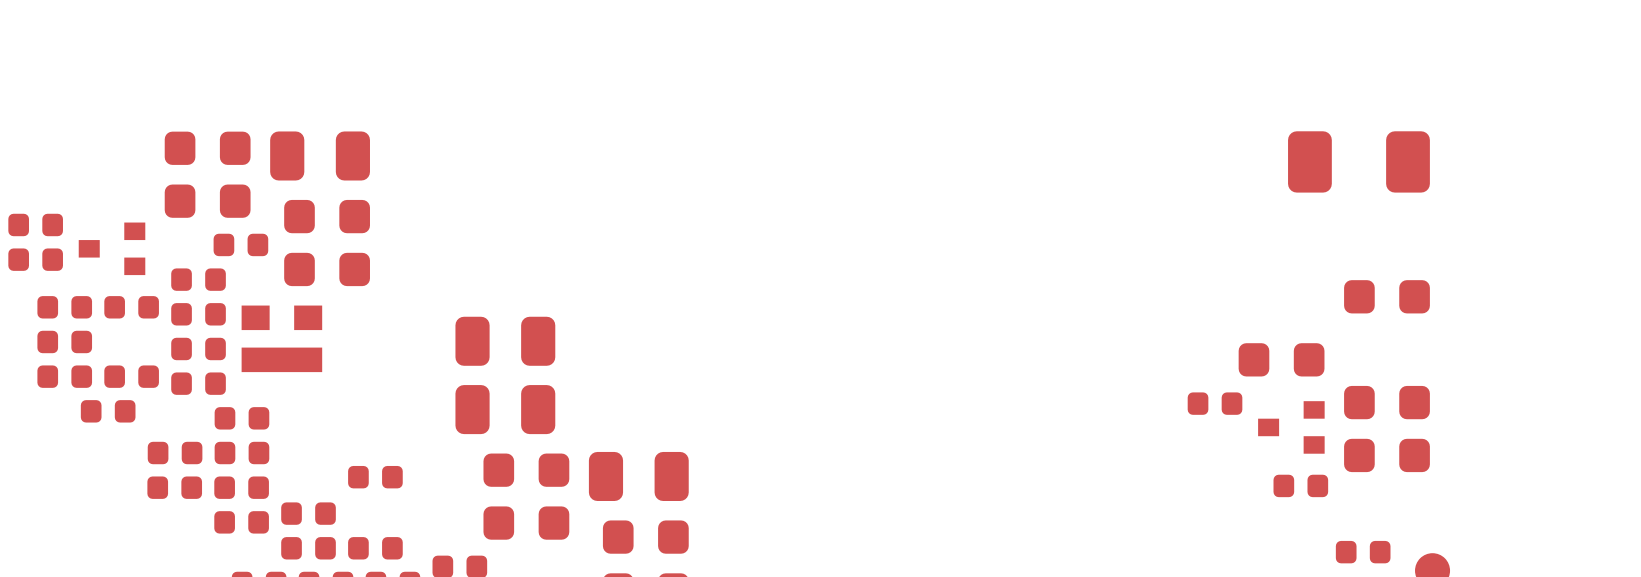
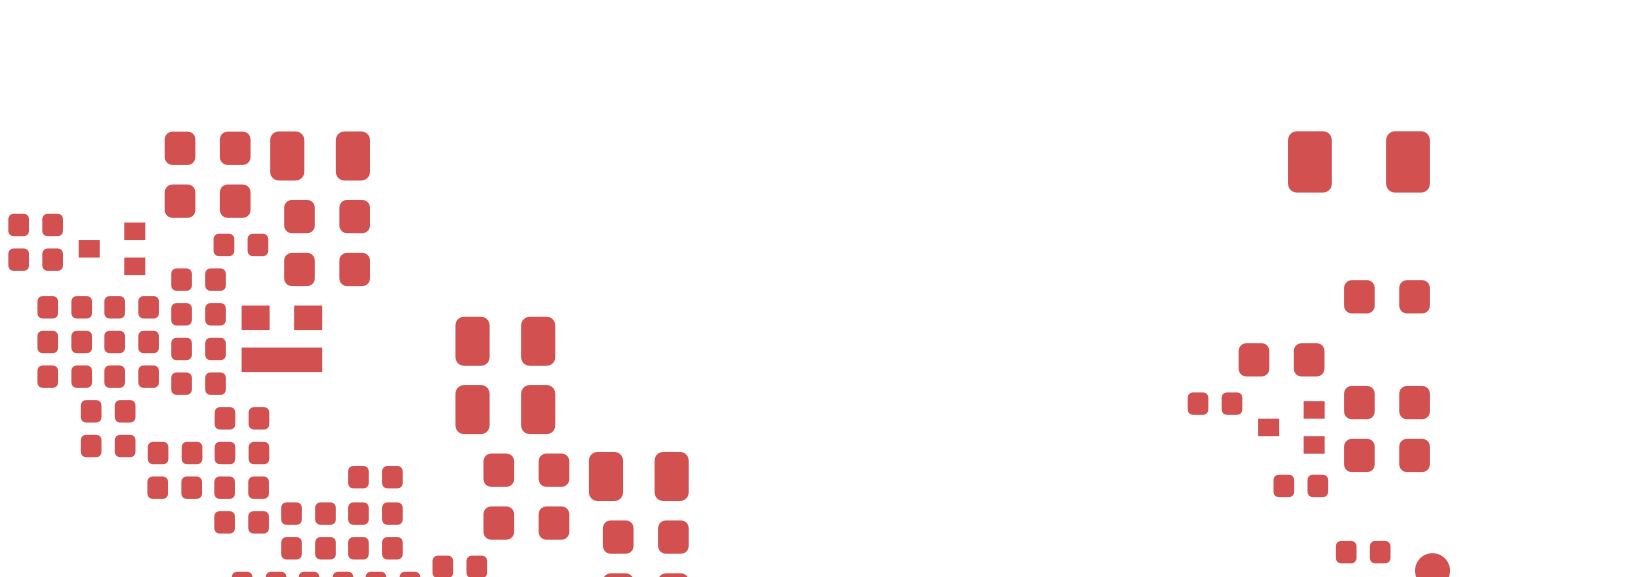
part: none -> (131, 341)
part: none -> (108, 446)
part: none -> (375, 513)

